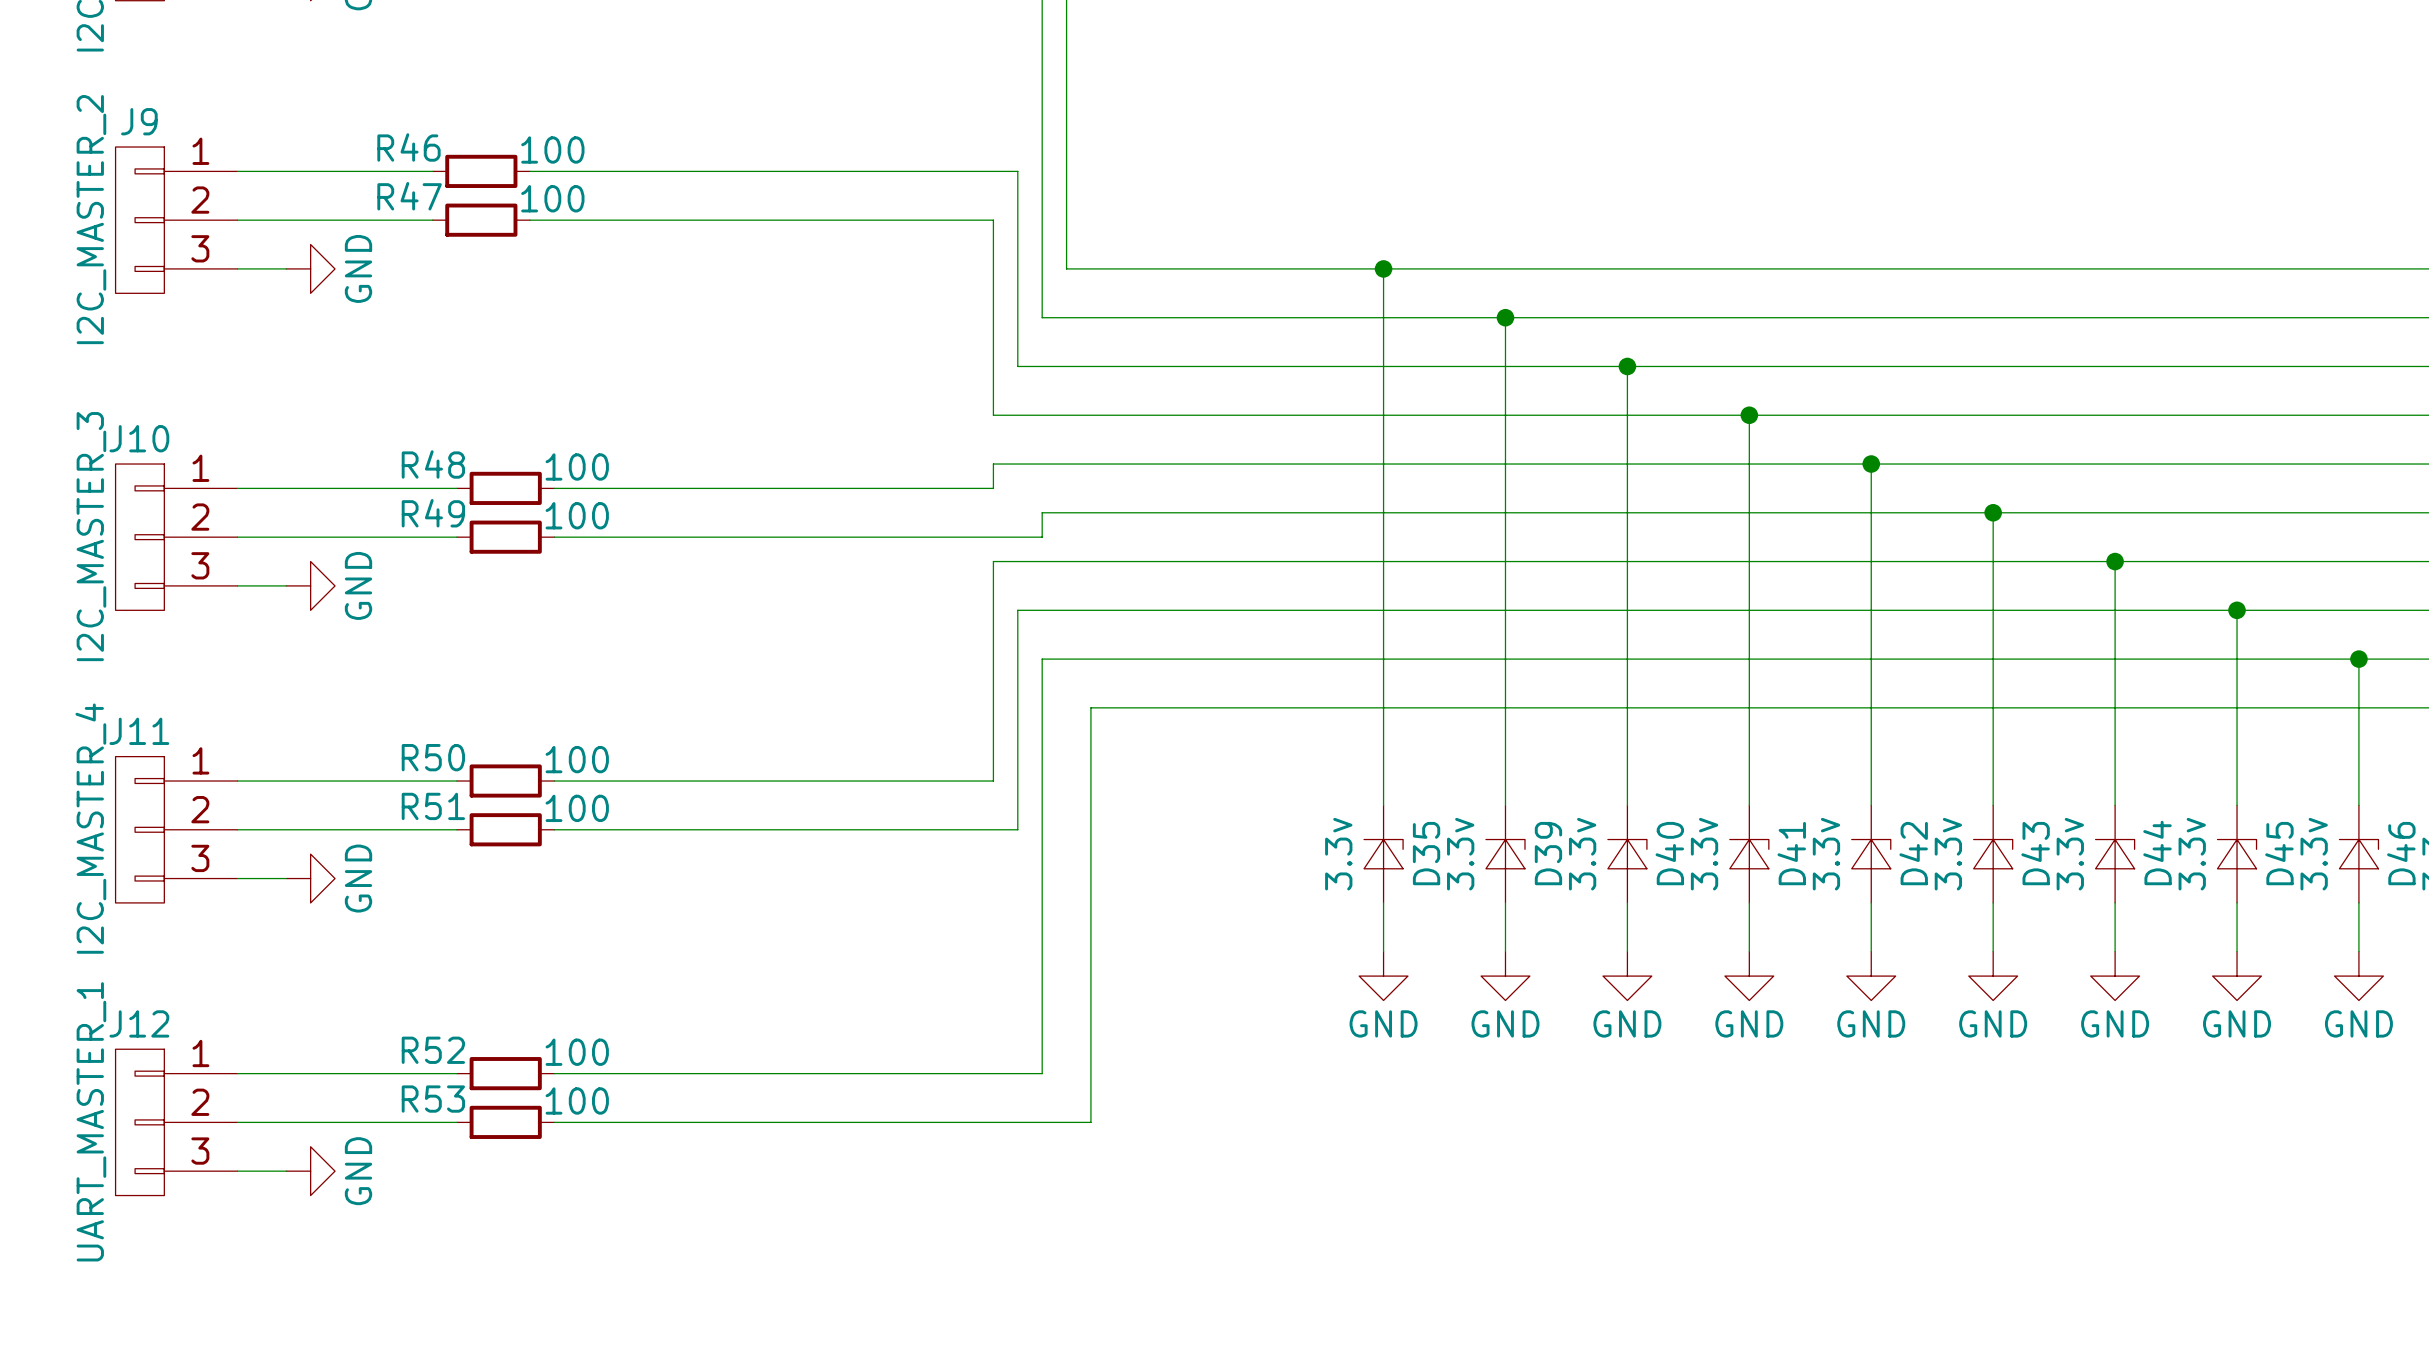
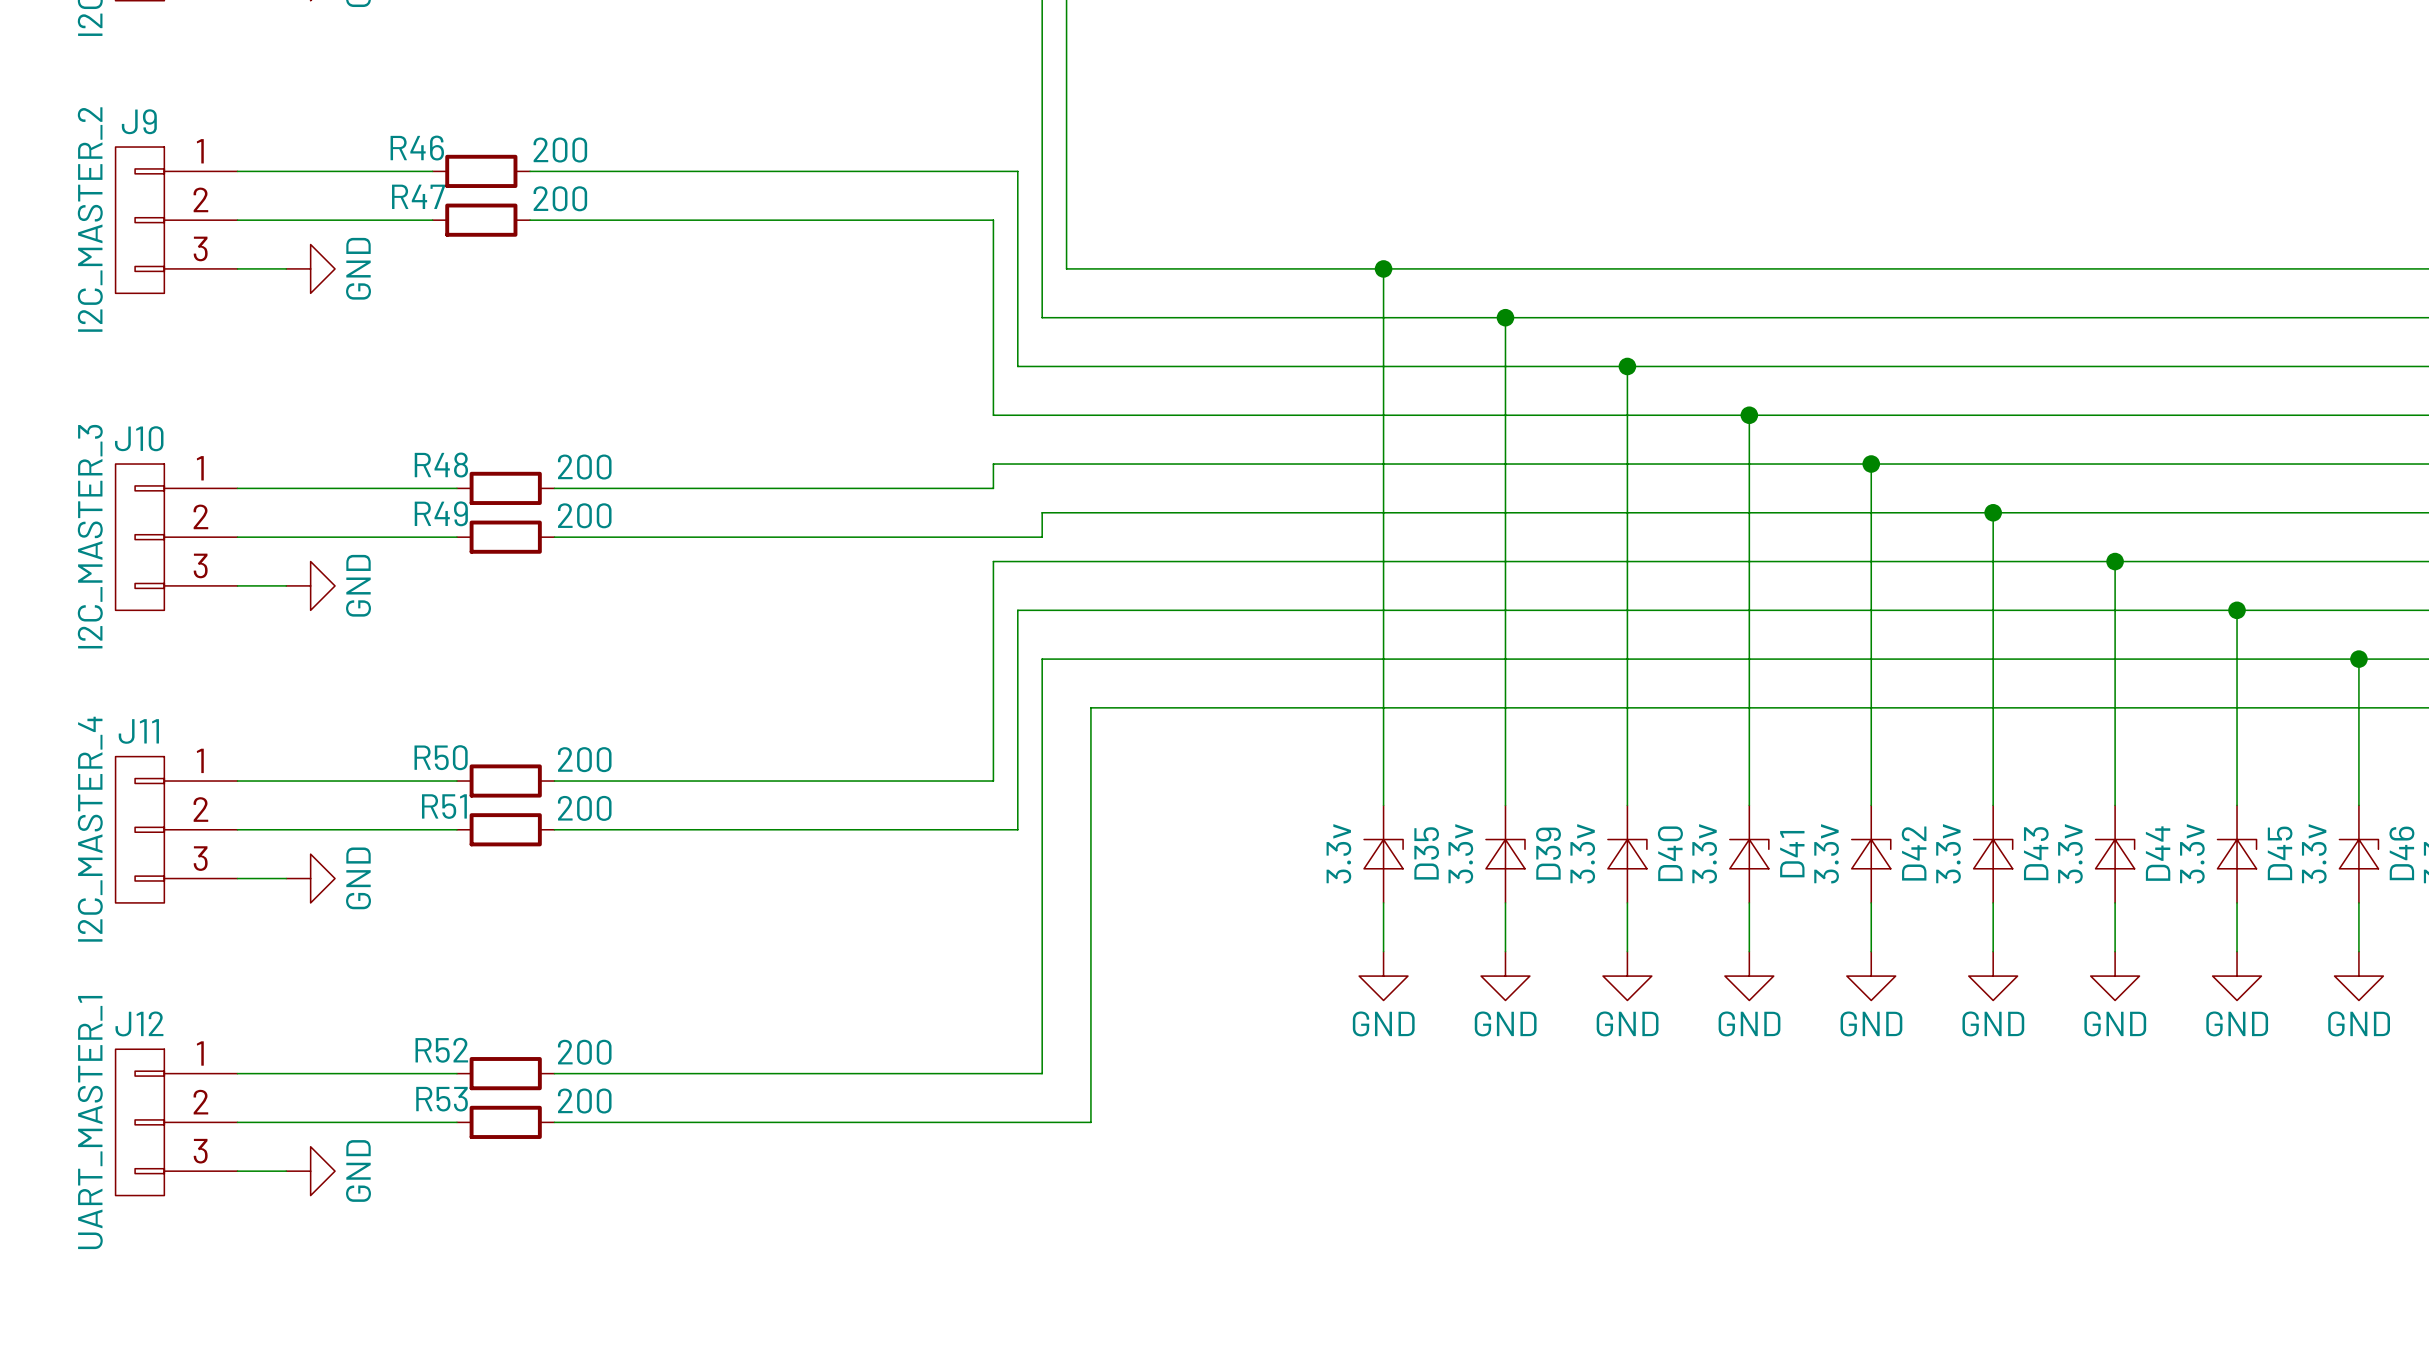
R46 value: 100 (552, 150) -> 200 (560, 150)
R47 value: 100 (552, 198) -> 200 (560, 198)
R48 value: 100 (577, 467) -> 200 (584, 467)
R49 value: 100 (577, 515) -> 200 (584, 515)
R50 value: 100 (577, 759) -> 200 (584, 759)
R51 value: 100 (577, 808) -> 200 (584, 808)
R52 value: 100 (577, 1052) -> 200 (584, 1052)
R53 value: 100 (577, 1100) -> 200 (584, 1101)

